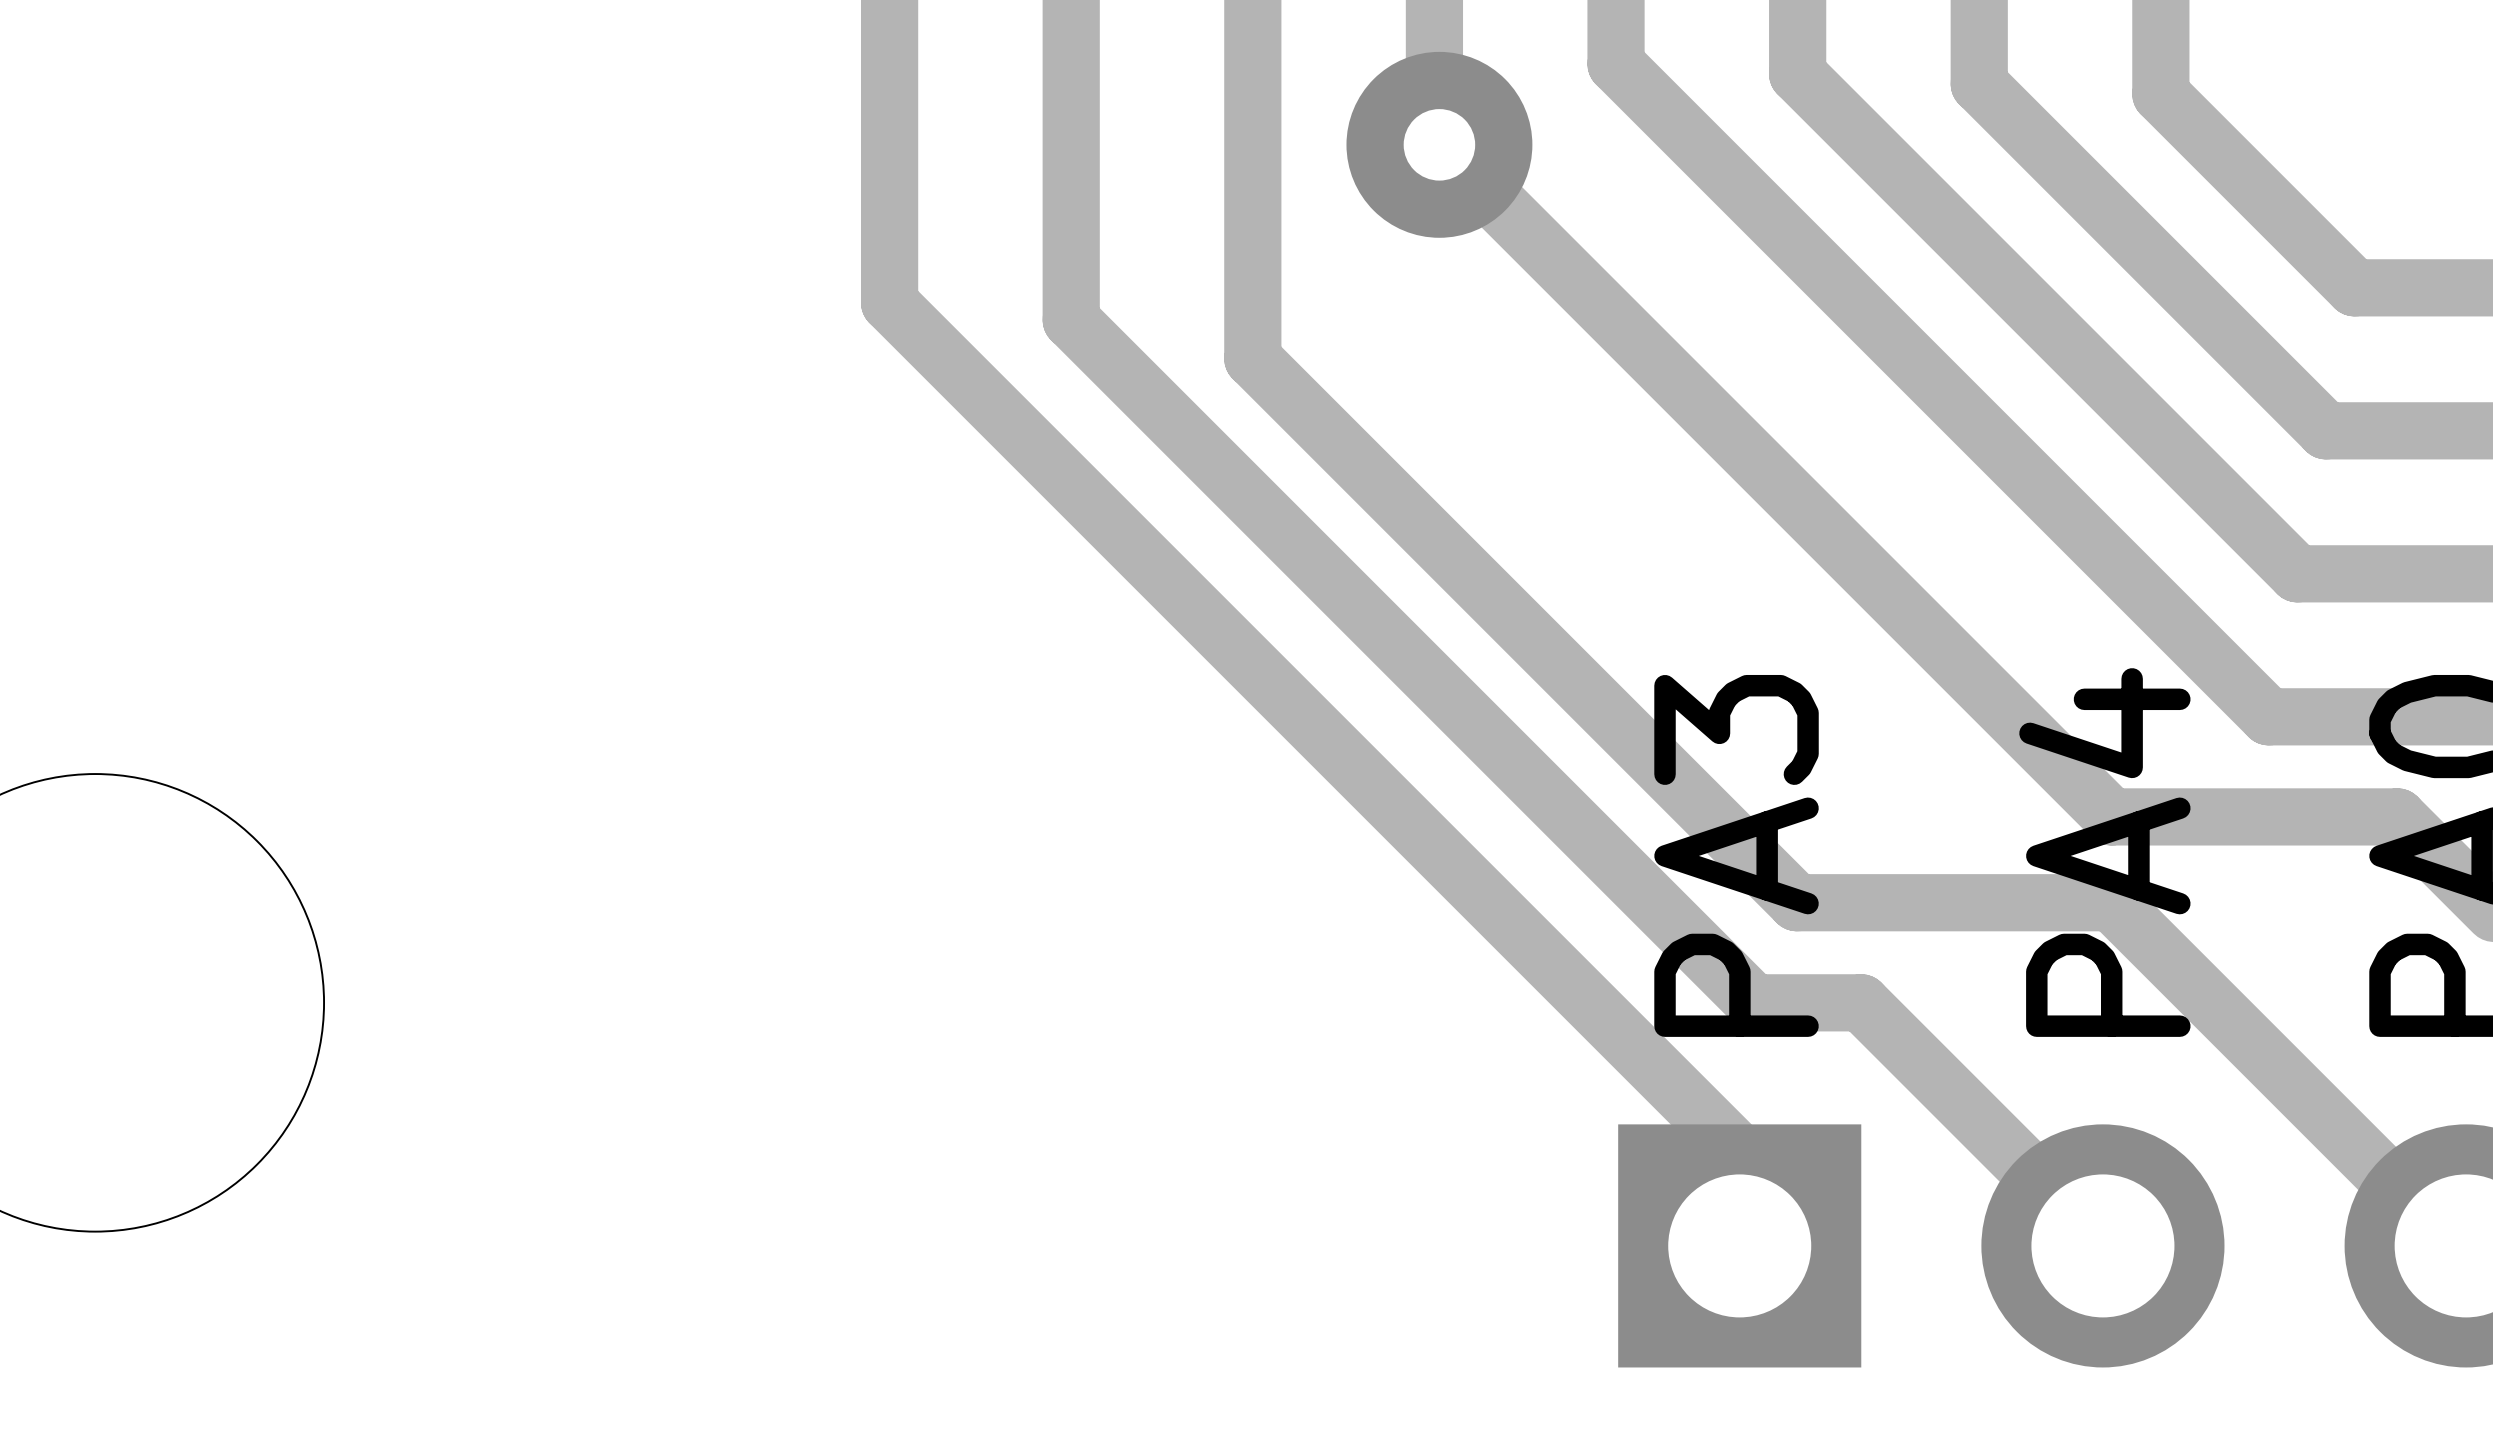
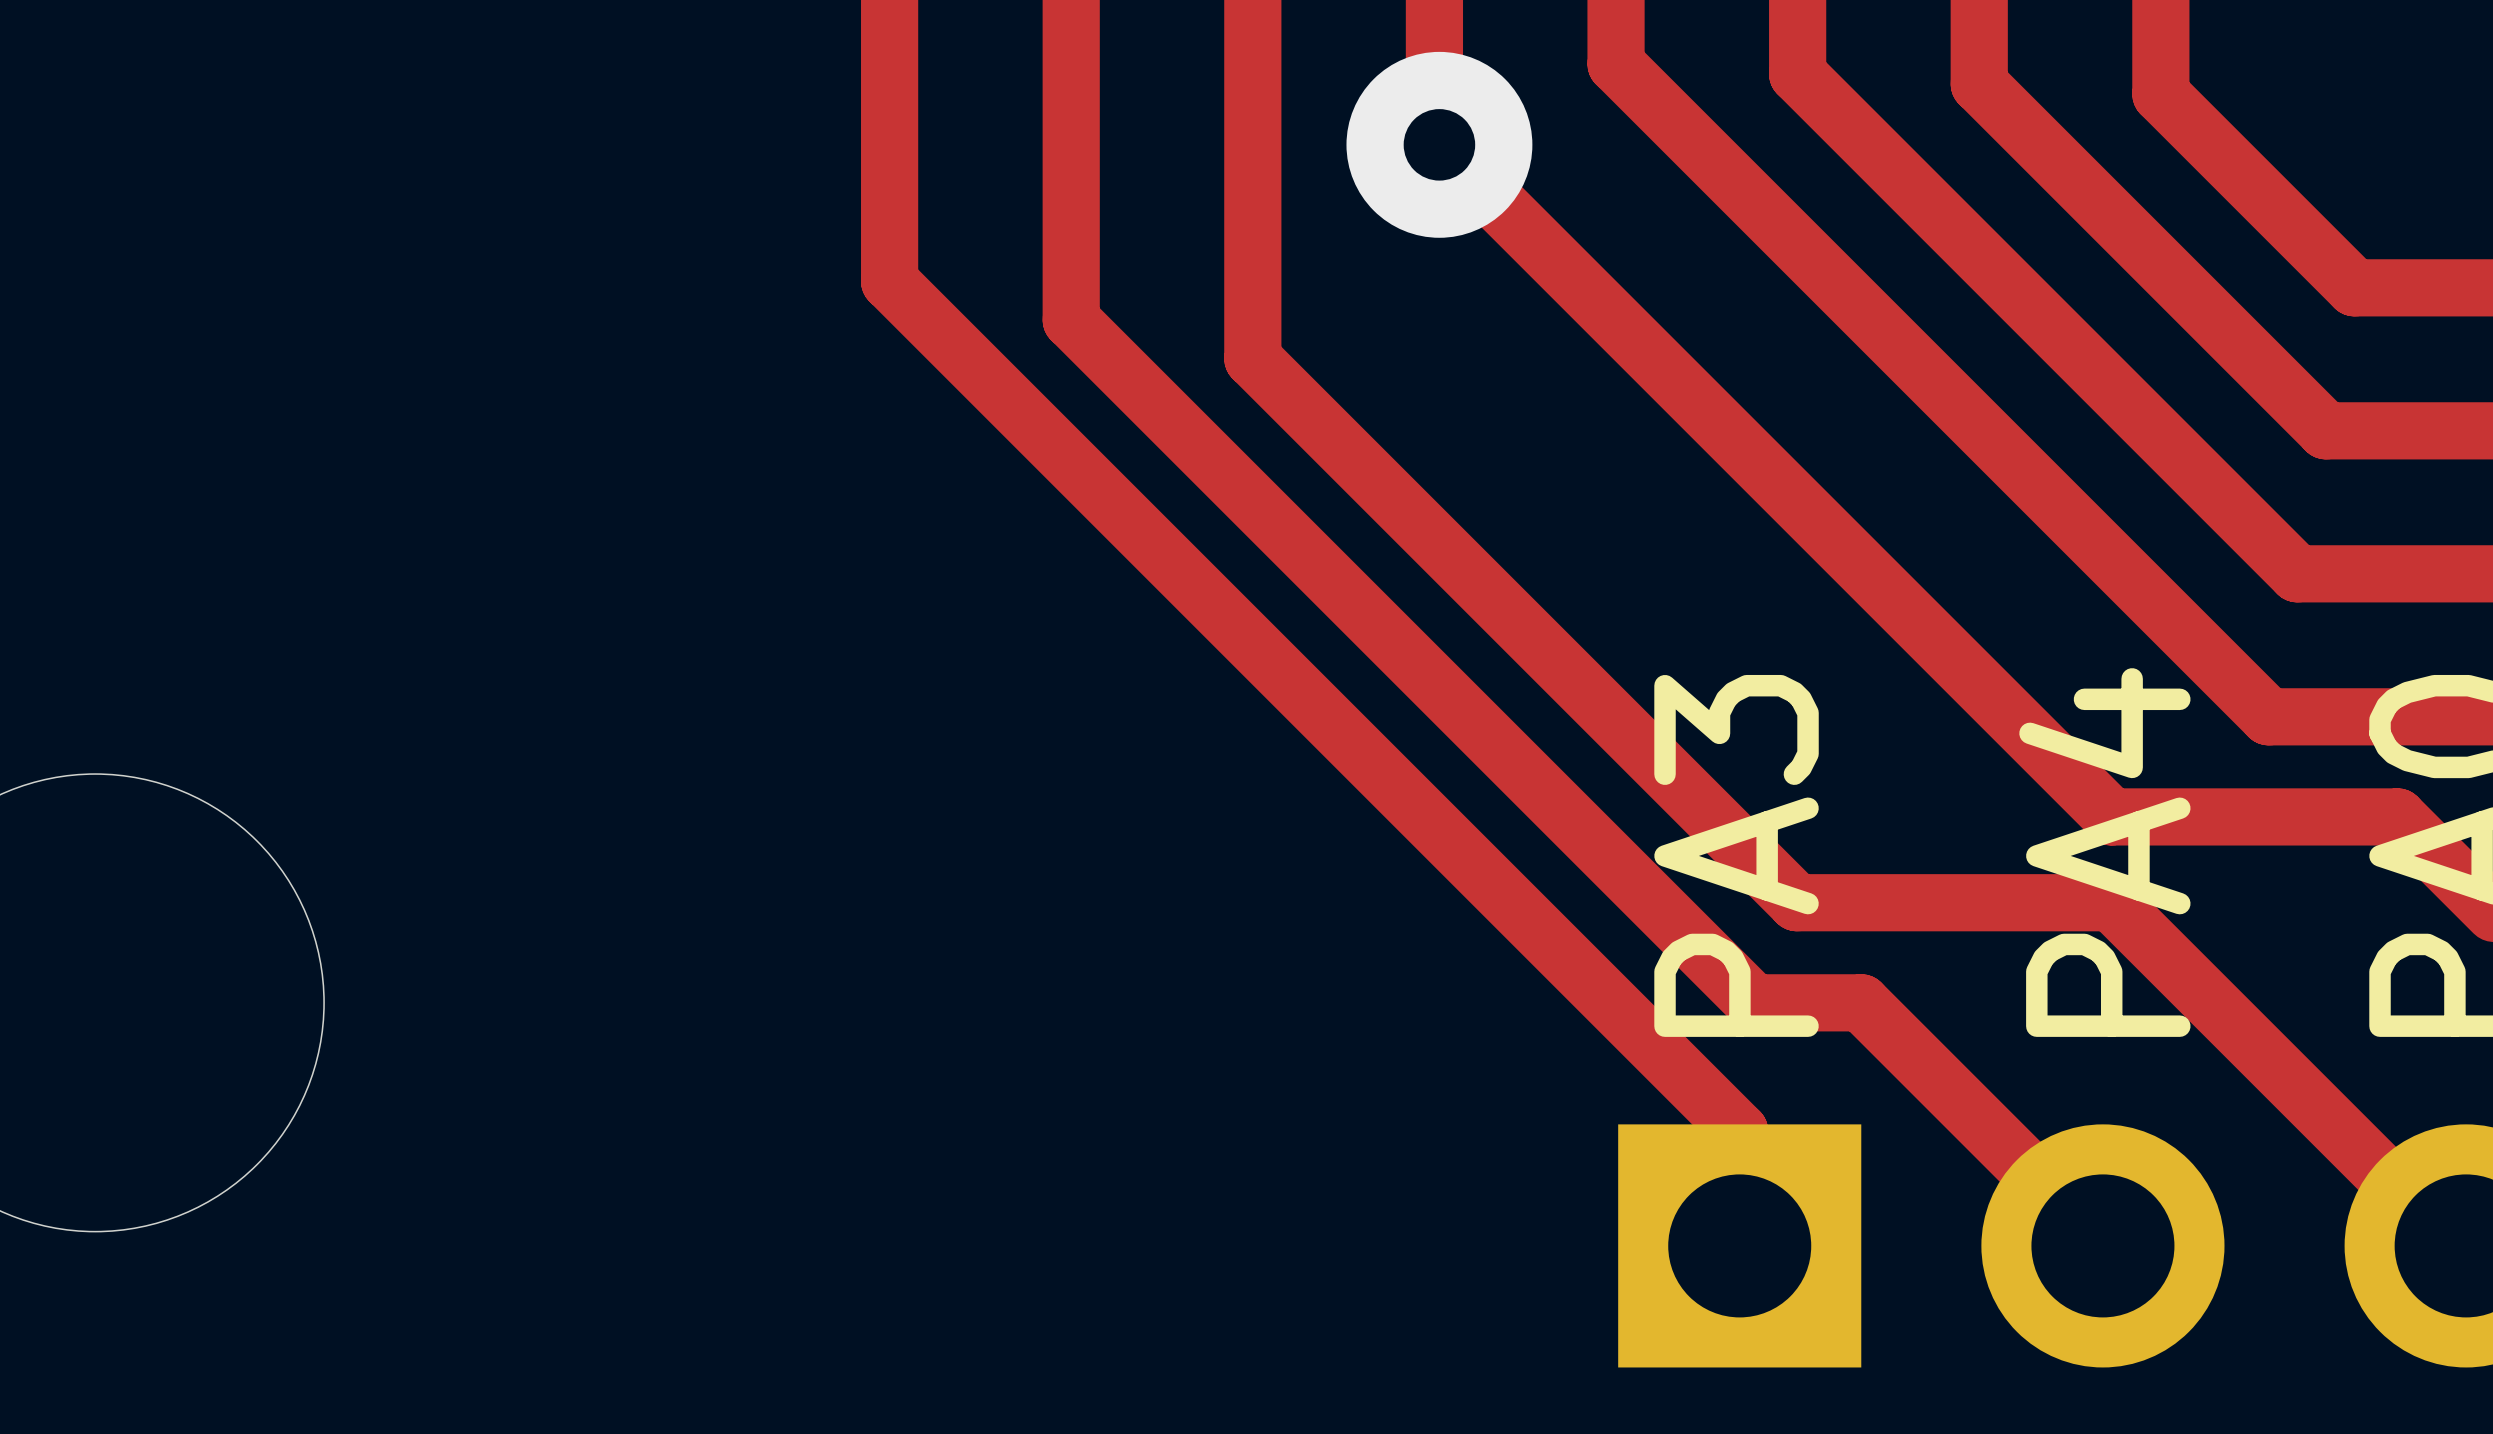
track: (889, 281) (889, 302) (1739, 1152) -> (889, 281) (1739, 1131) (1739, 1152)

